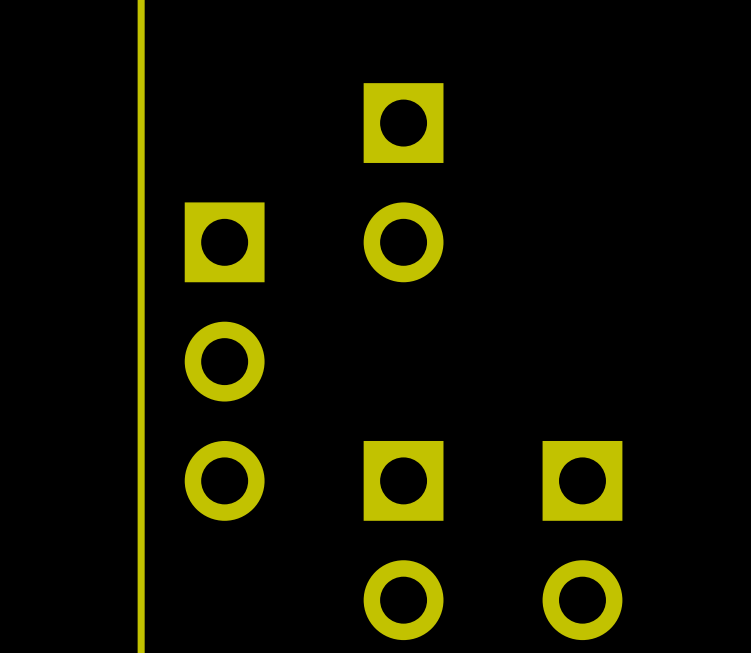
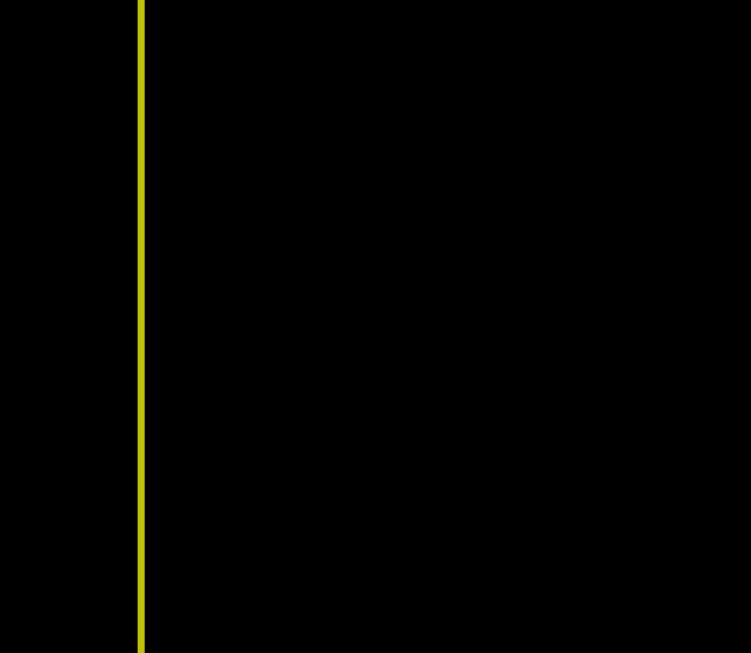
part: (403, 182) -> none
part: (224, 361) -> none
part: (403, 540) -> none
part: (582, 540) -> none

